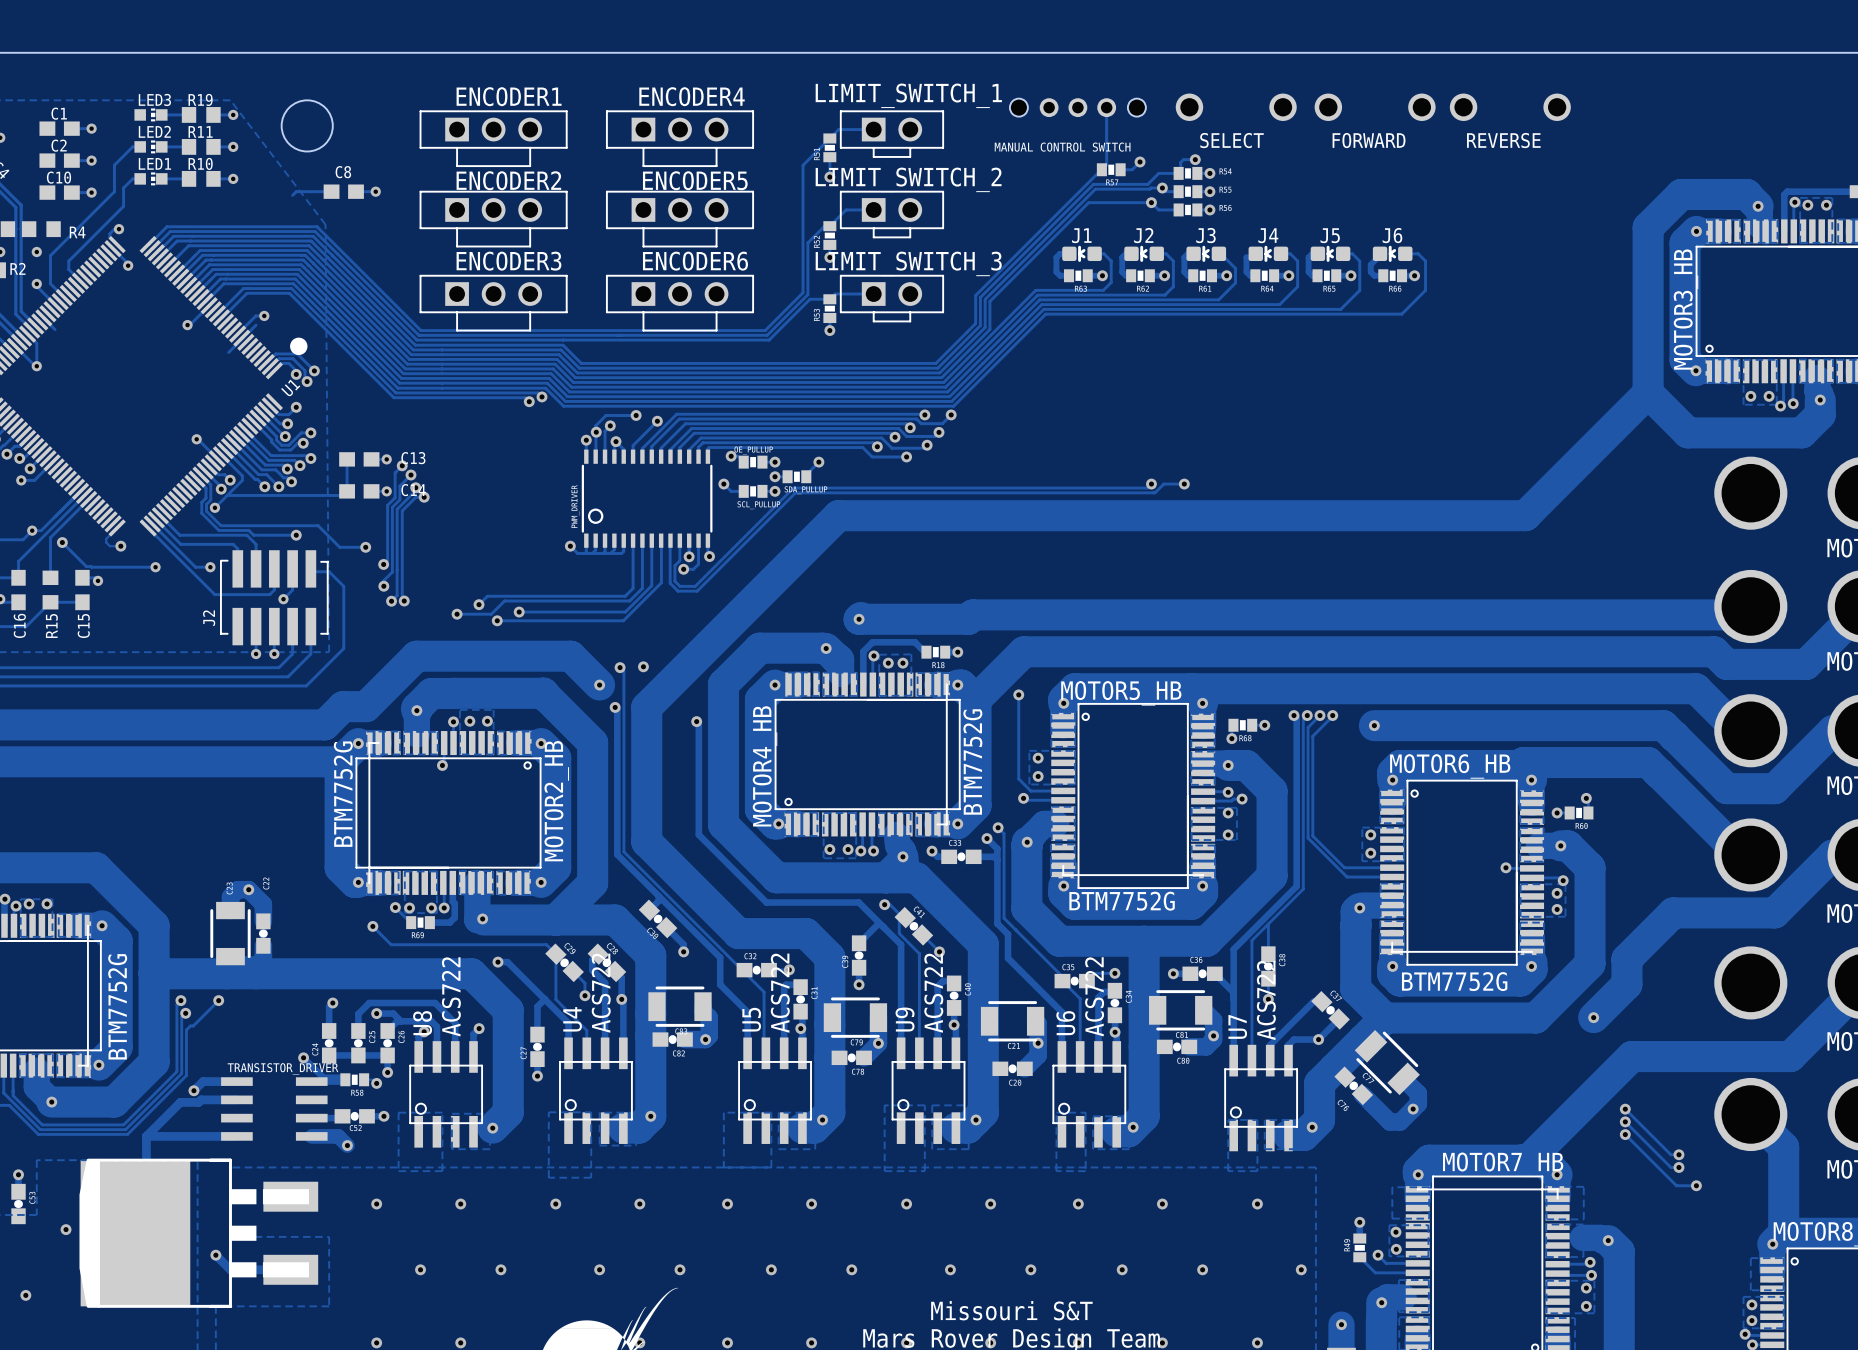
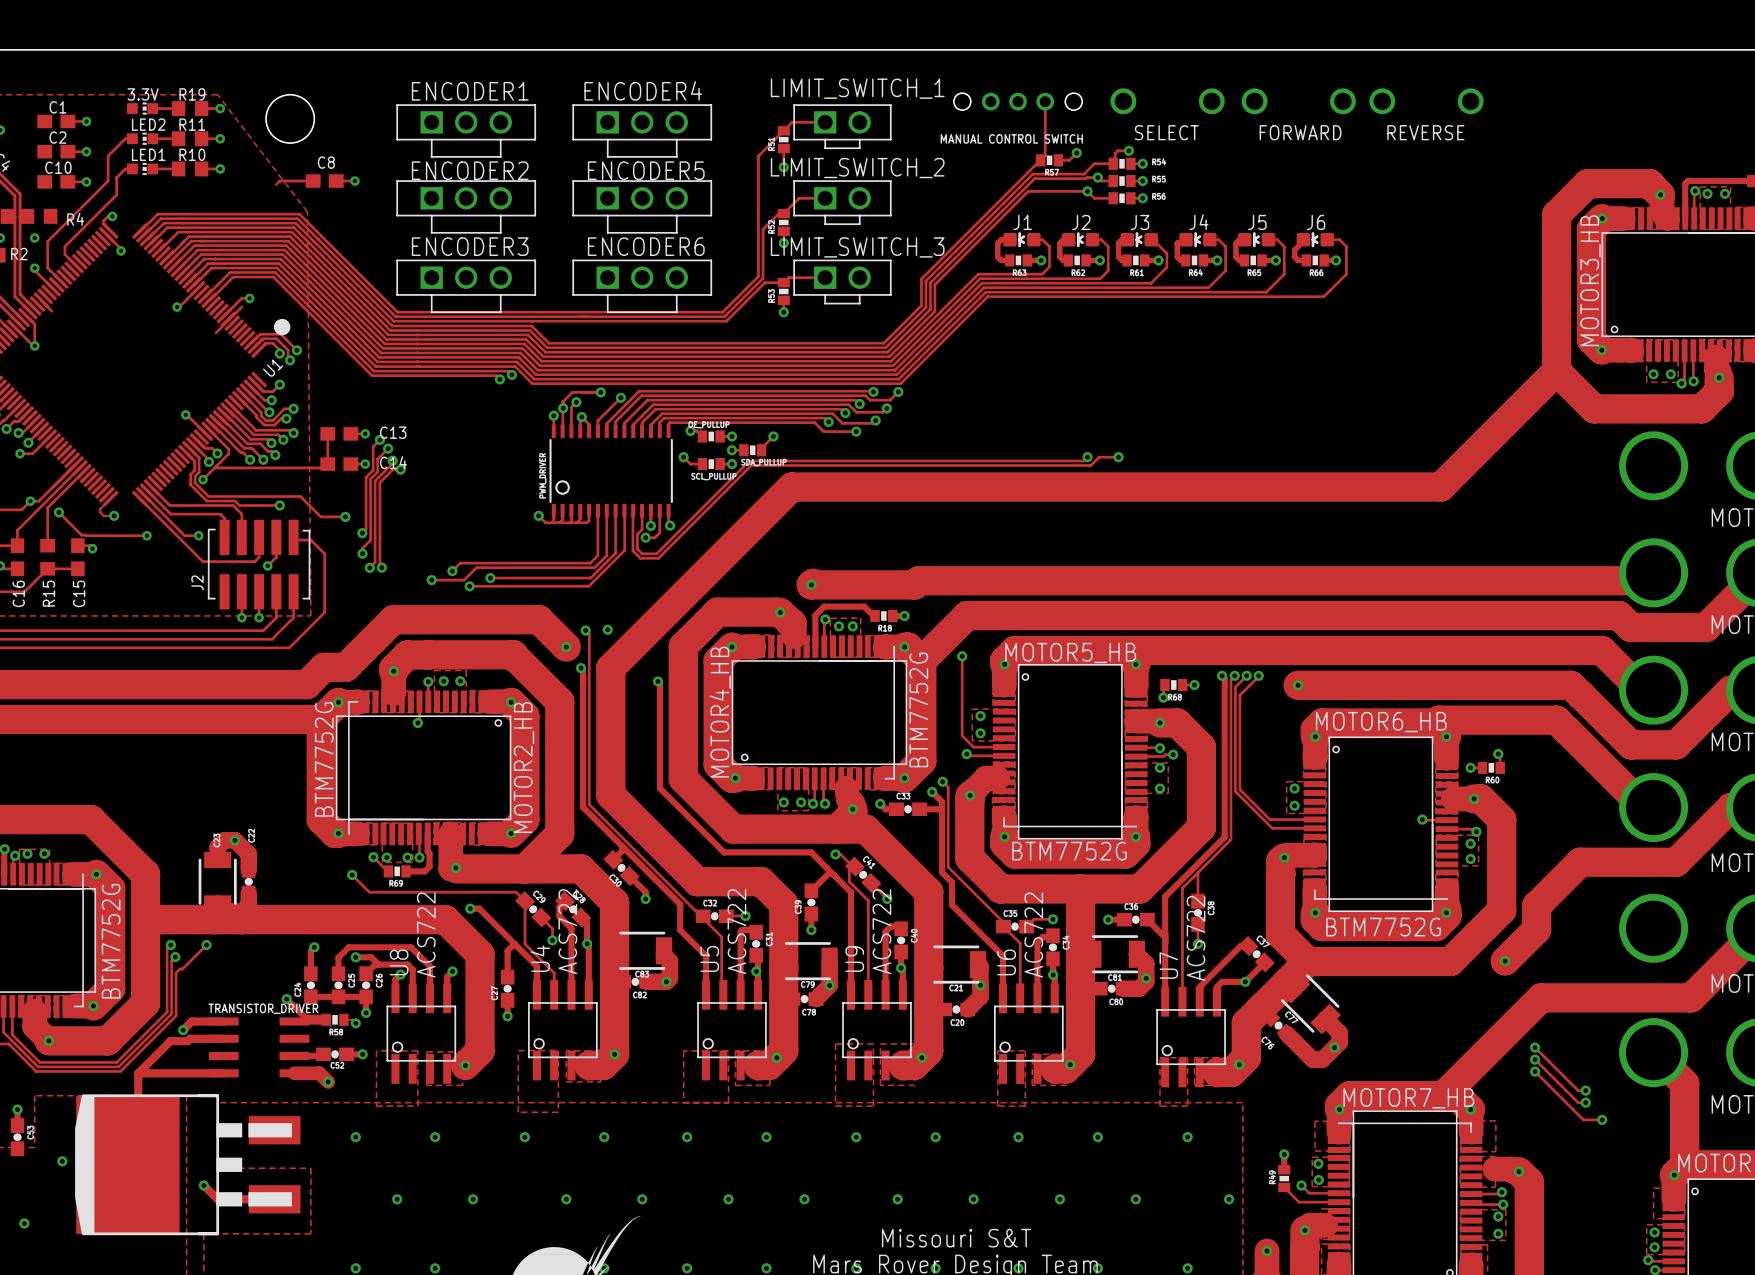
LED3 name: LED3 (154, 99) -> 3.3V (143, 94)

